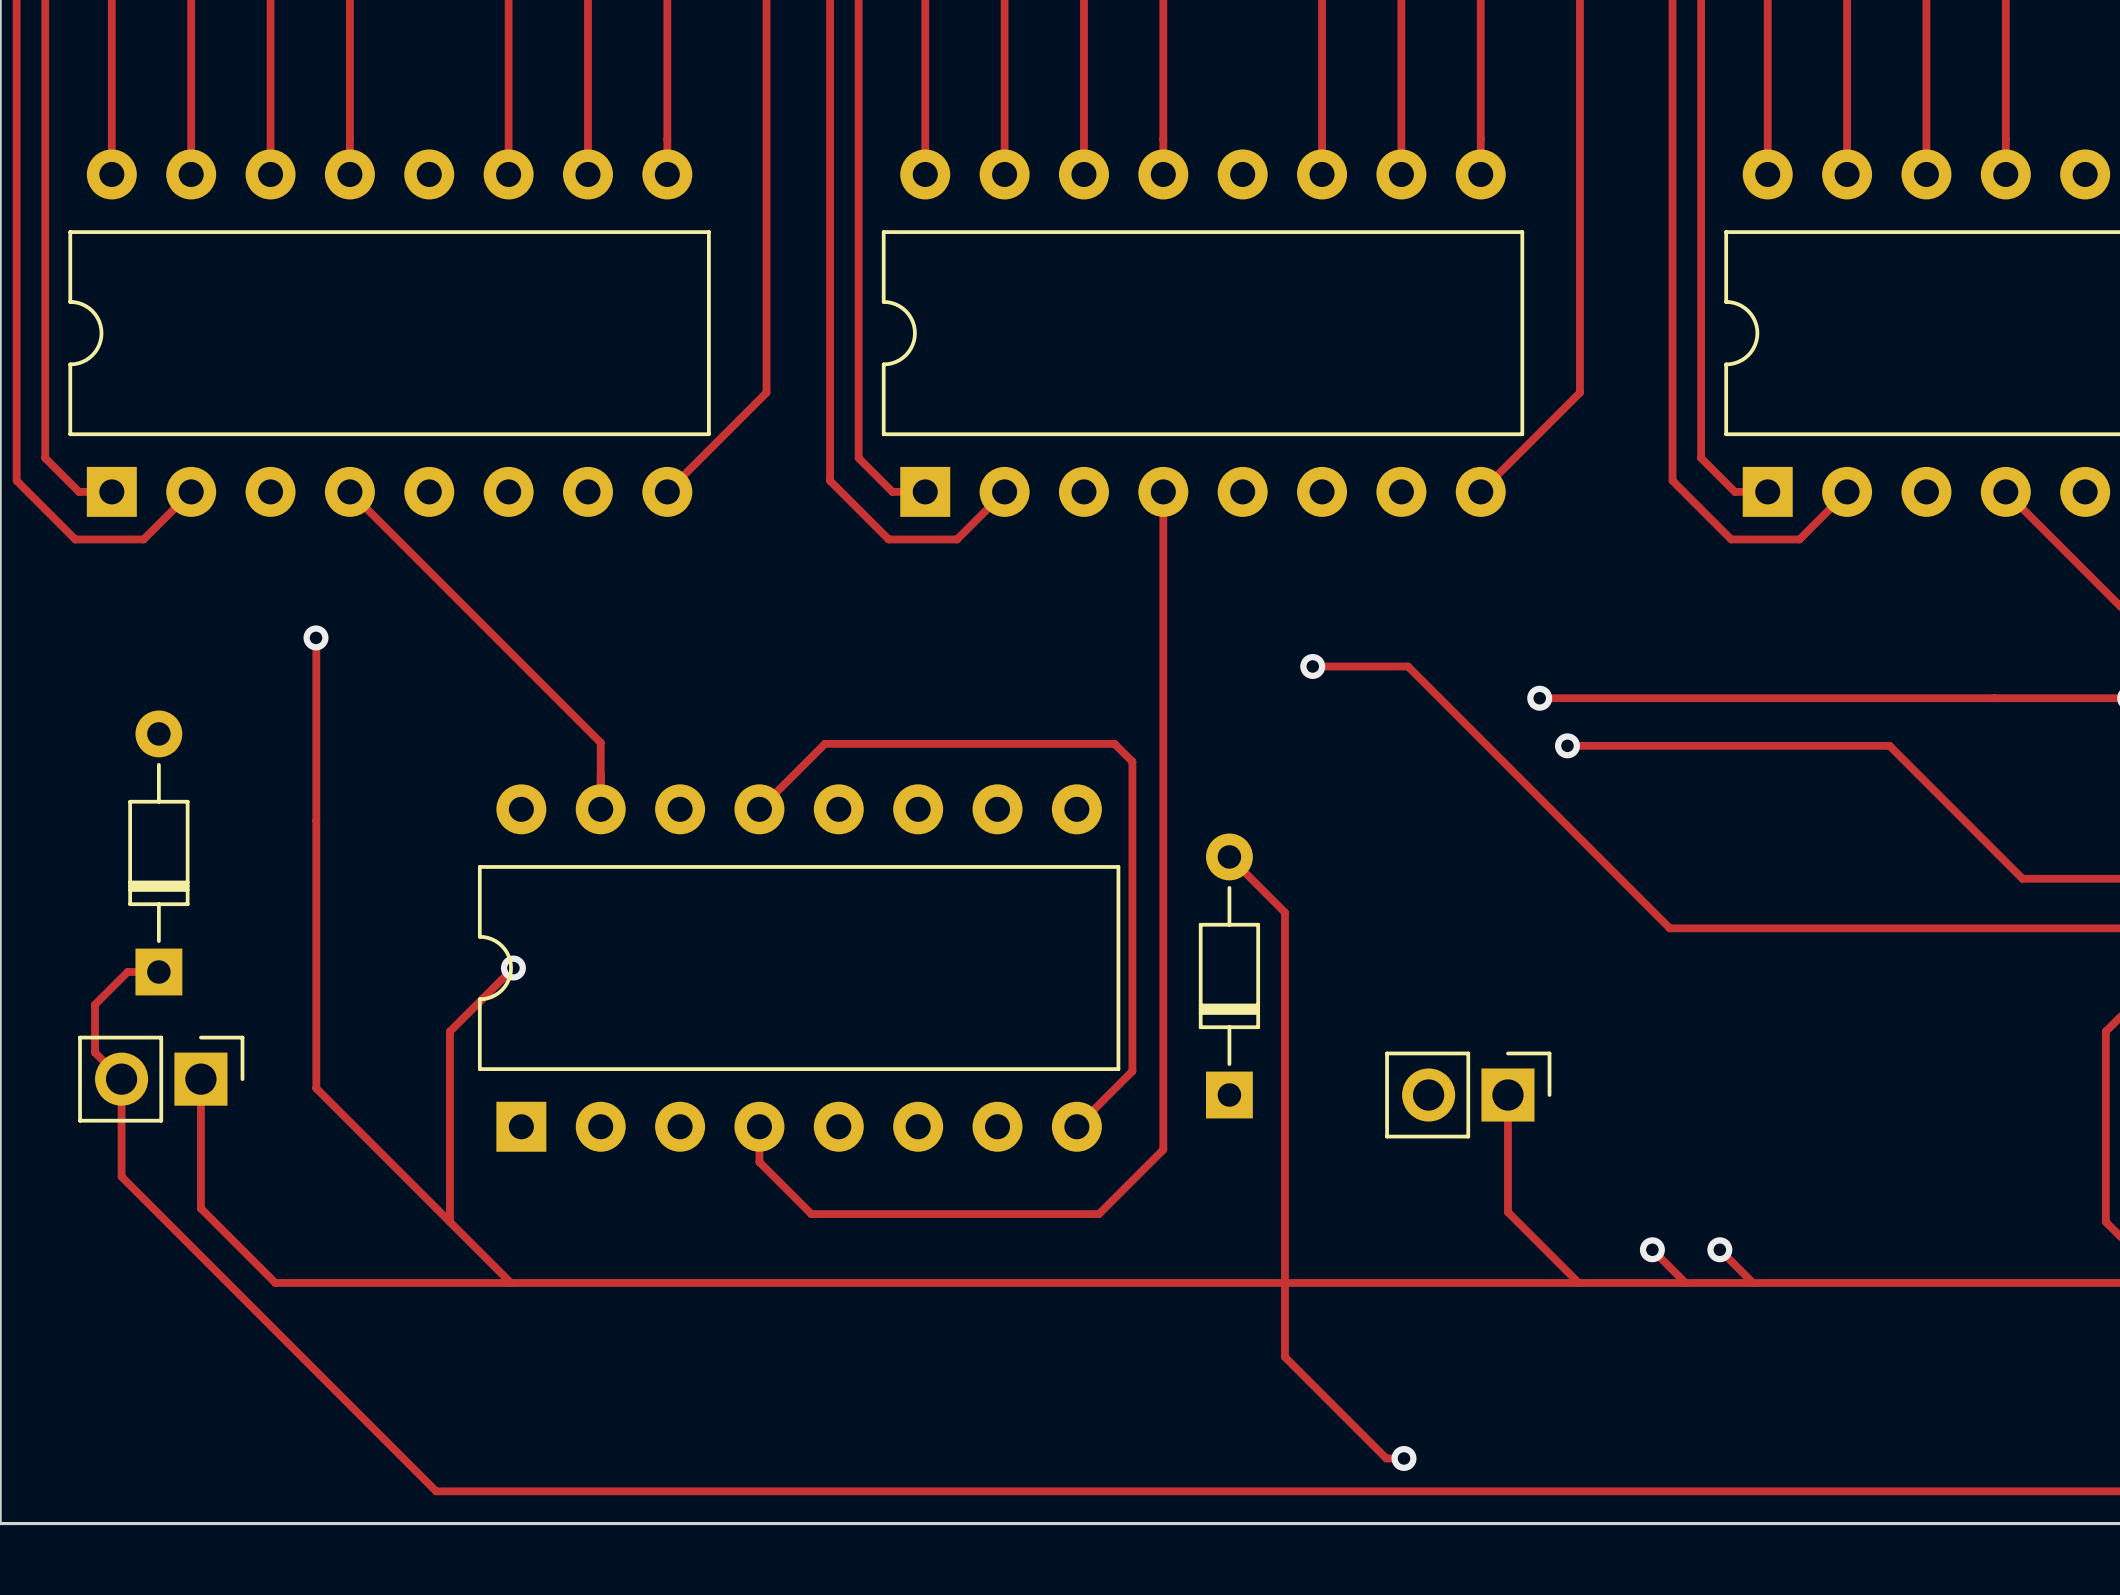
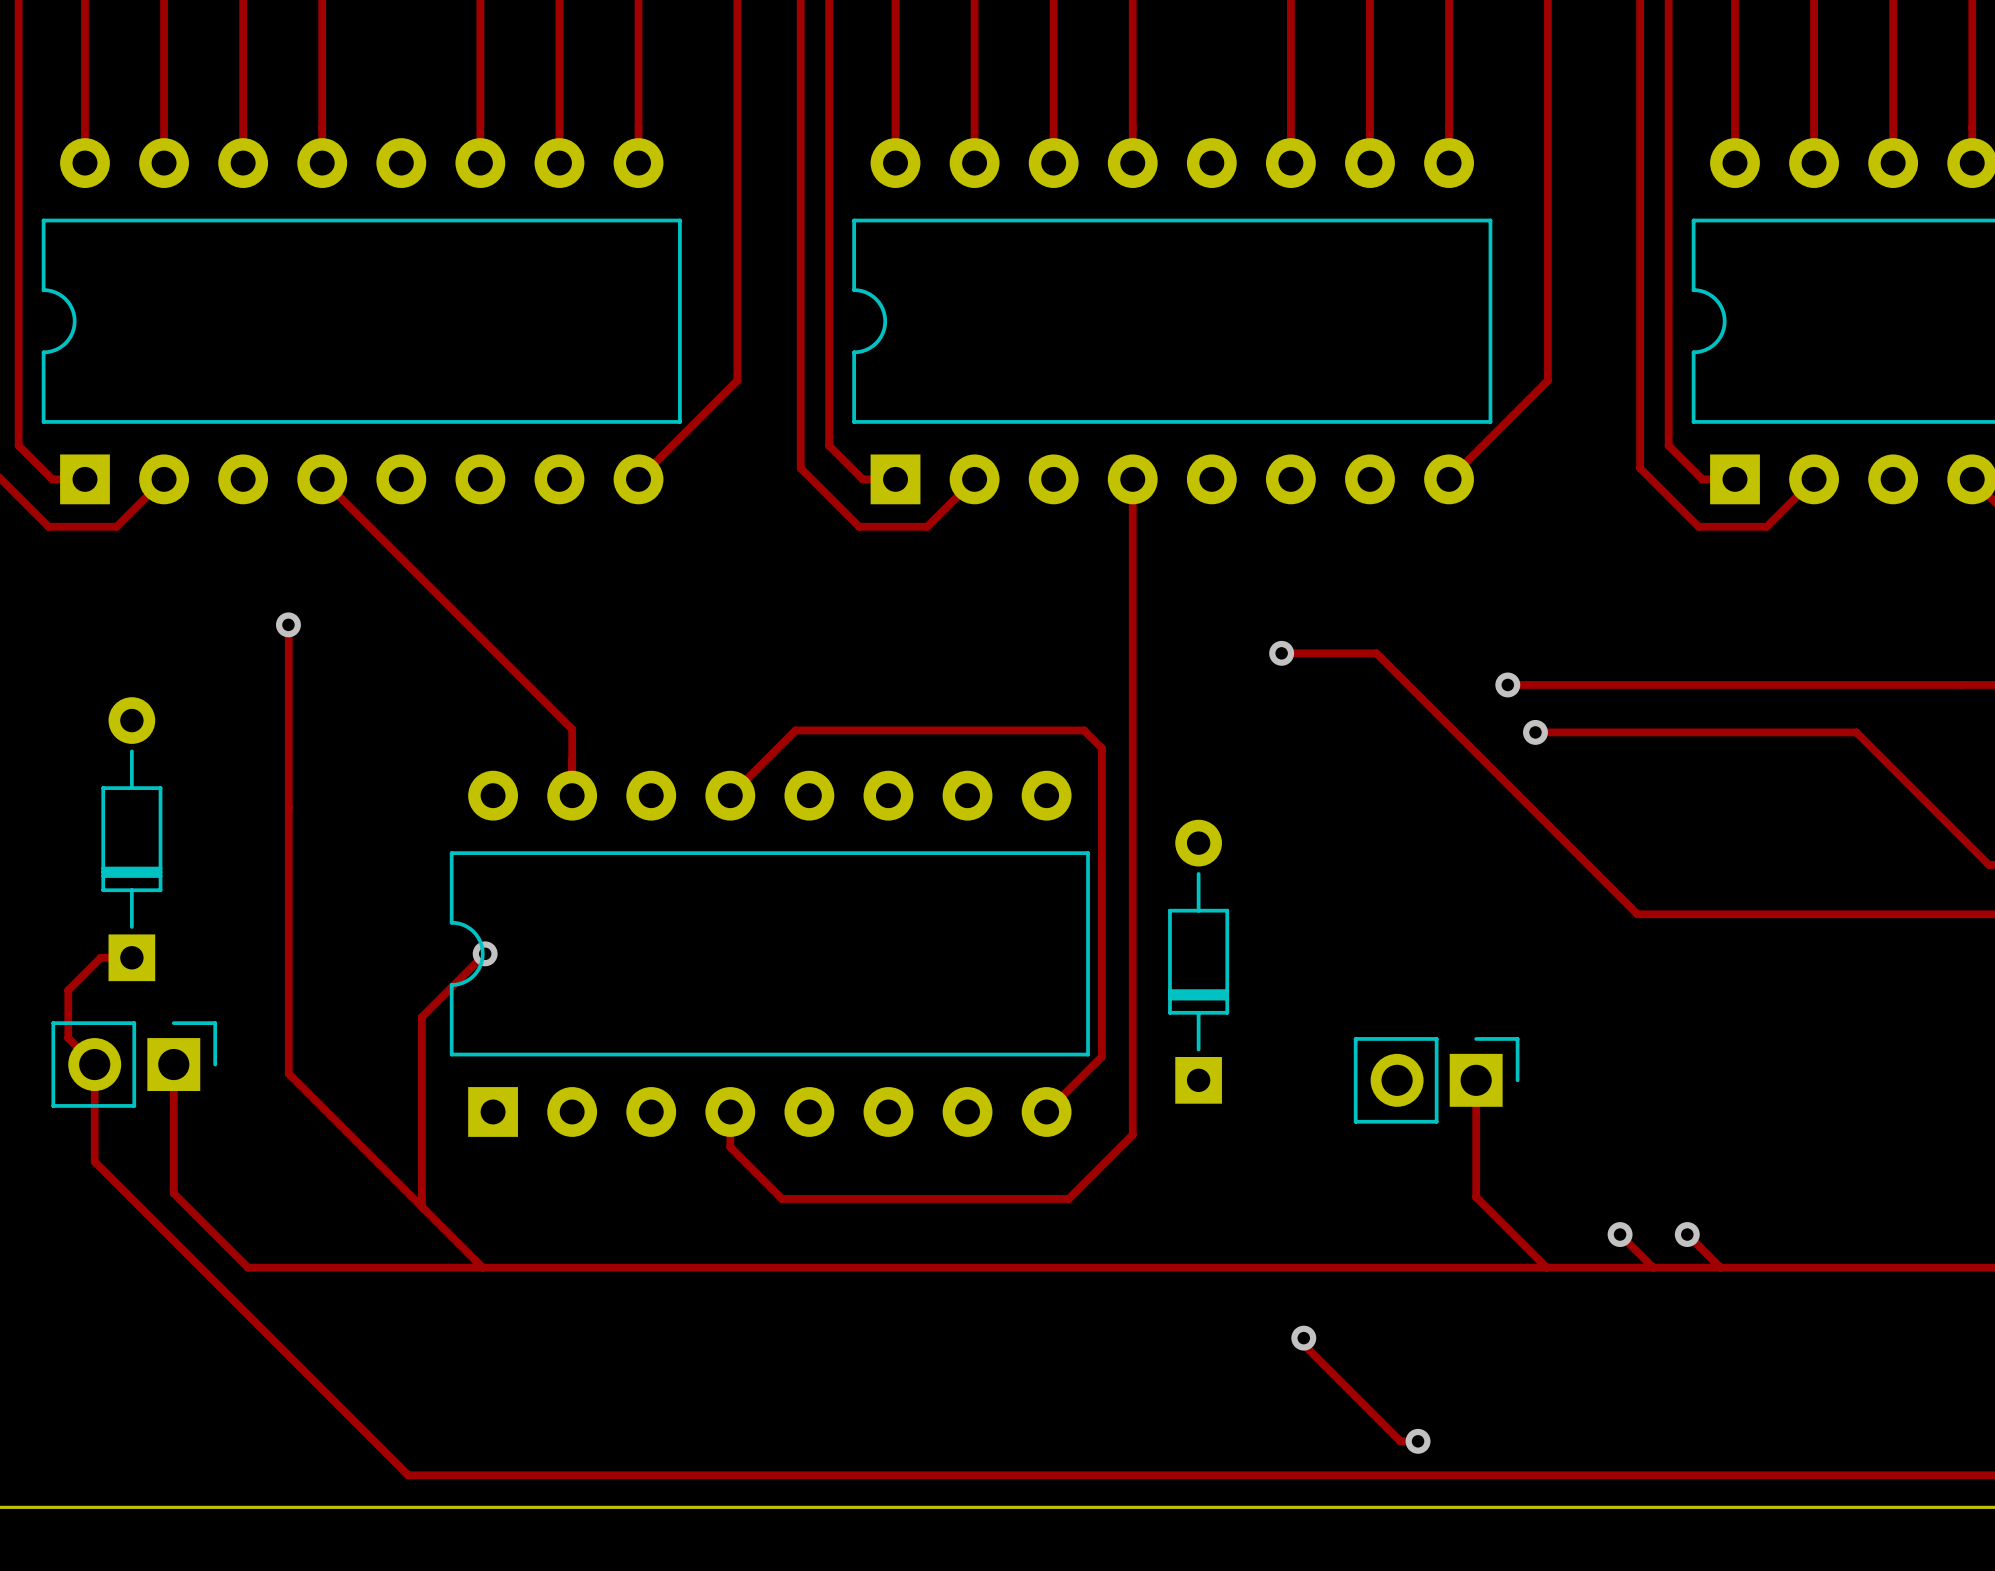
track: (1229, 856) (1284, 912) (1284, 1357) (1386, 1458) (1404, 1458) -> none
track: none -> (1303, 1338) (1304, 1345) (1400, 1441) (1418, 1441)
via: none -> (1303, 1338)
via position: (1404, 1458) -> (1418, 1441)

